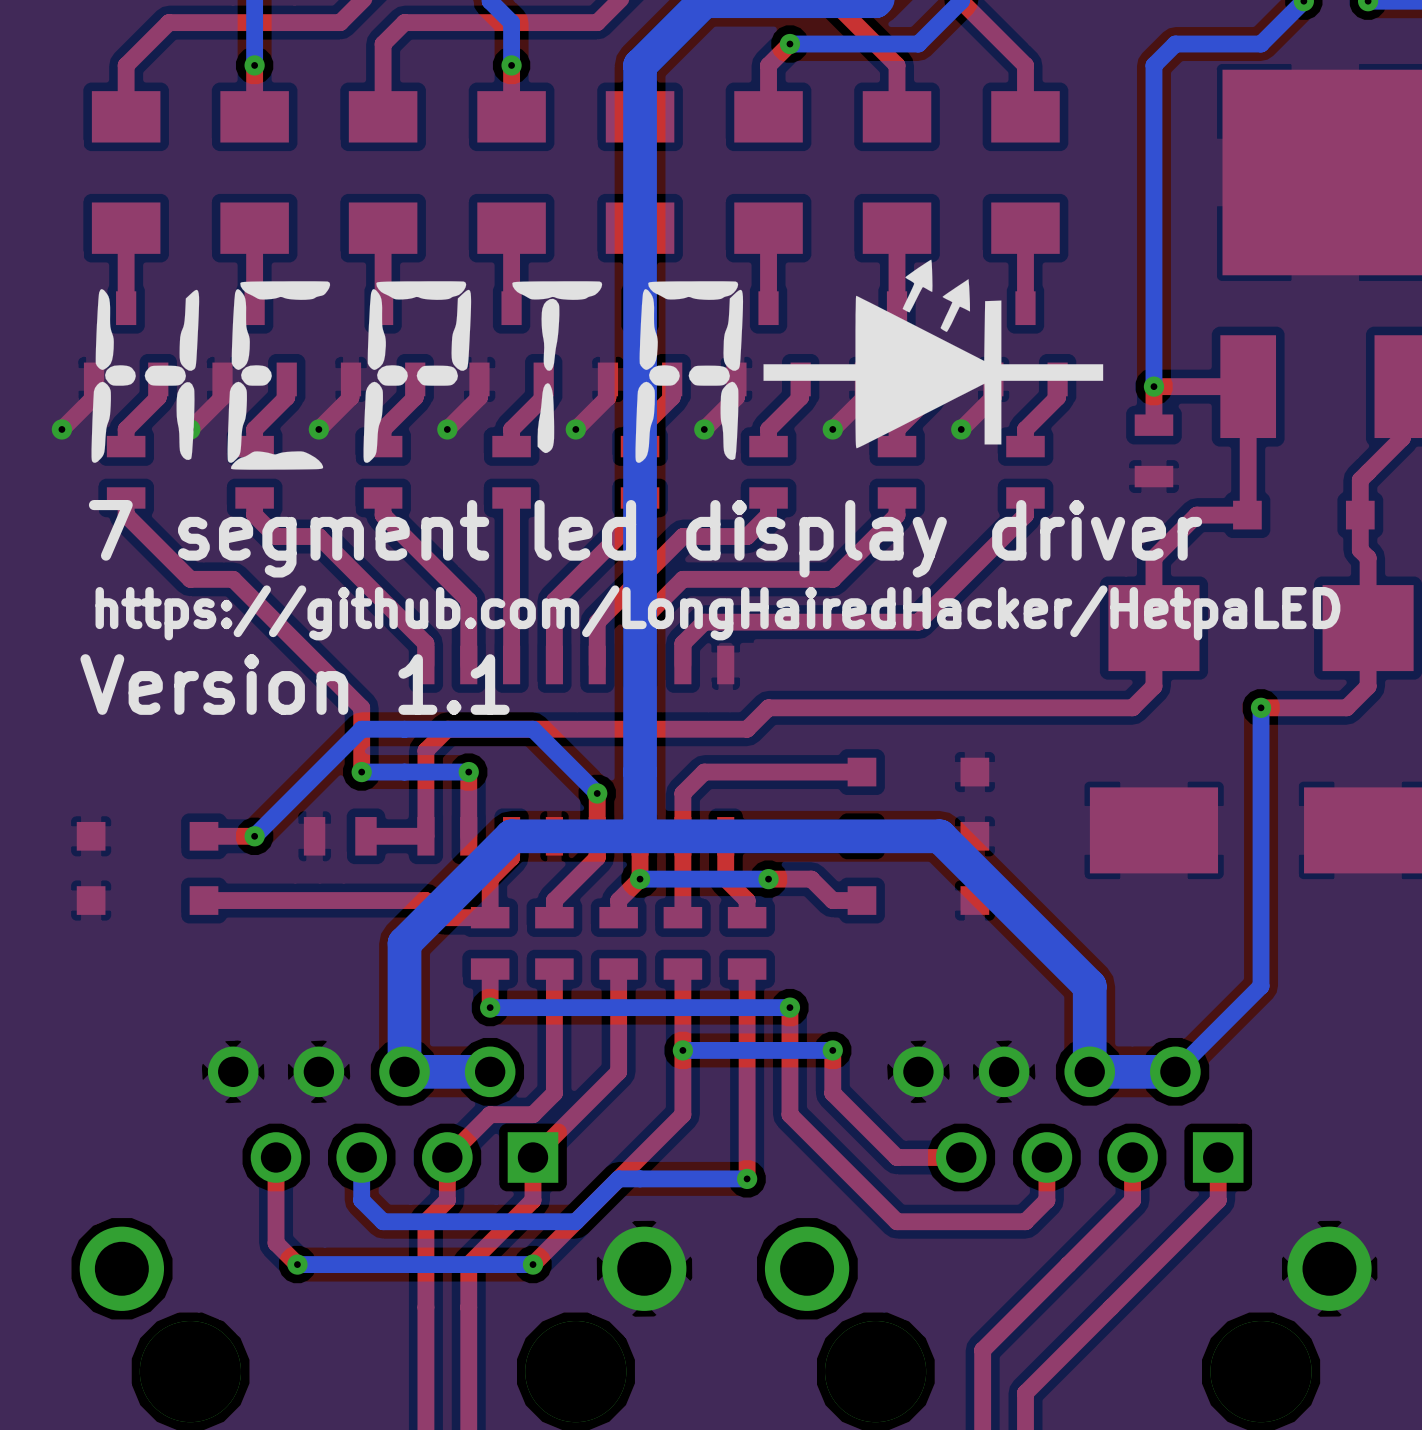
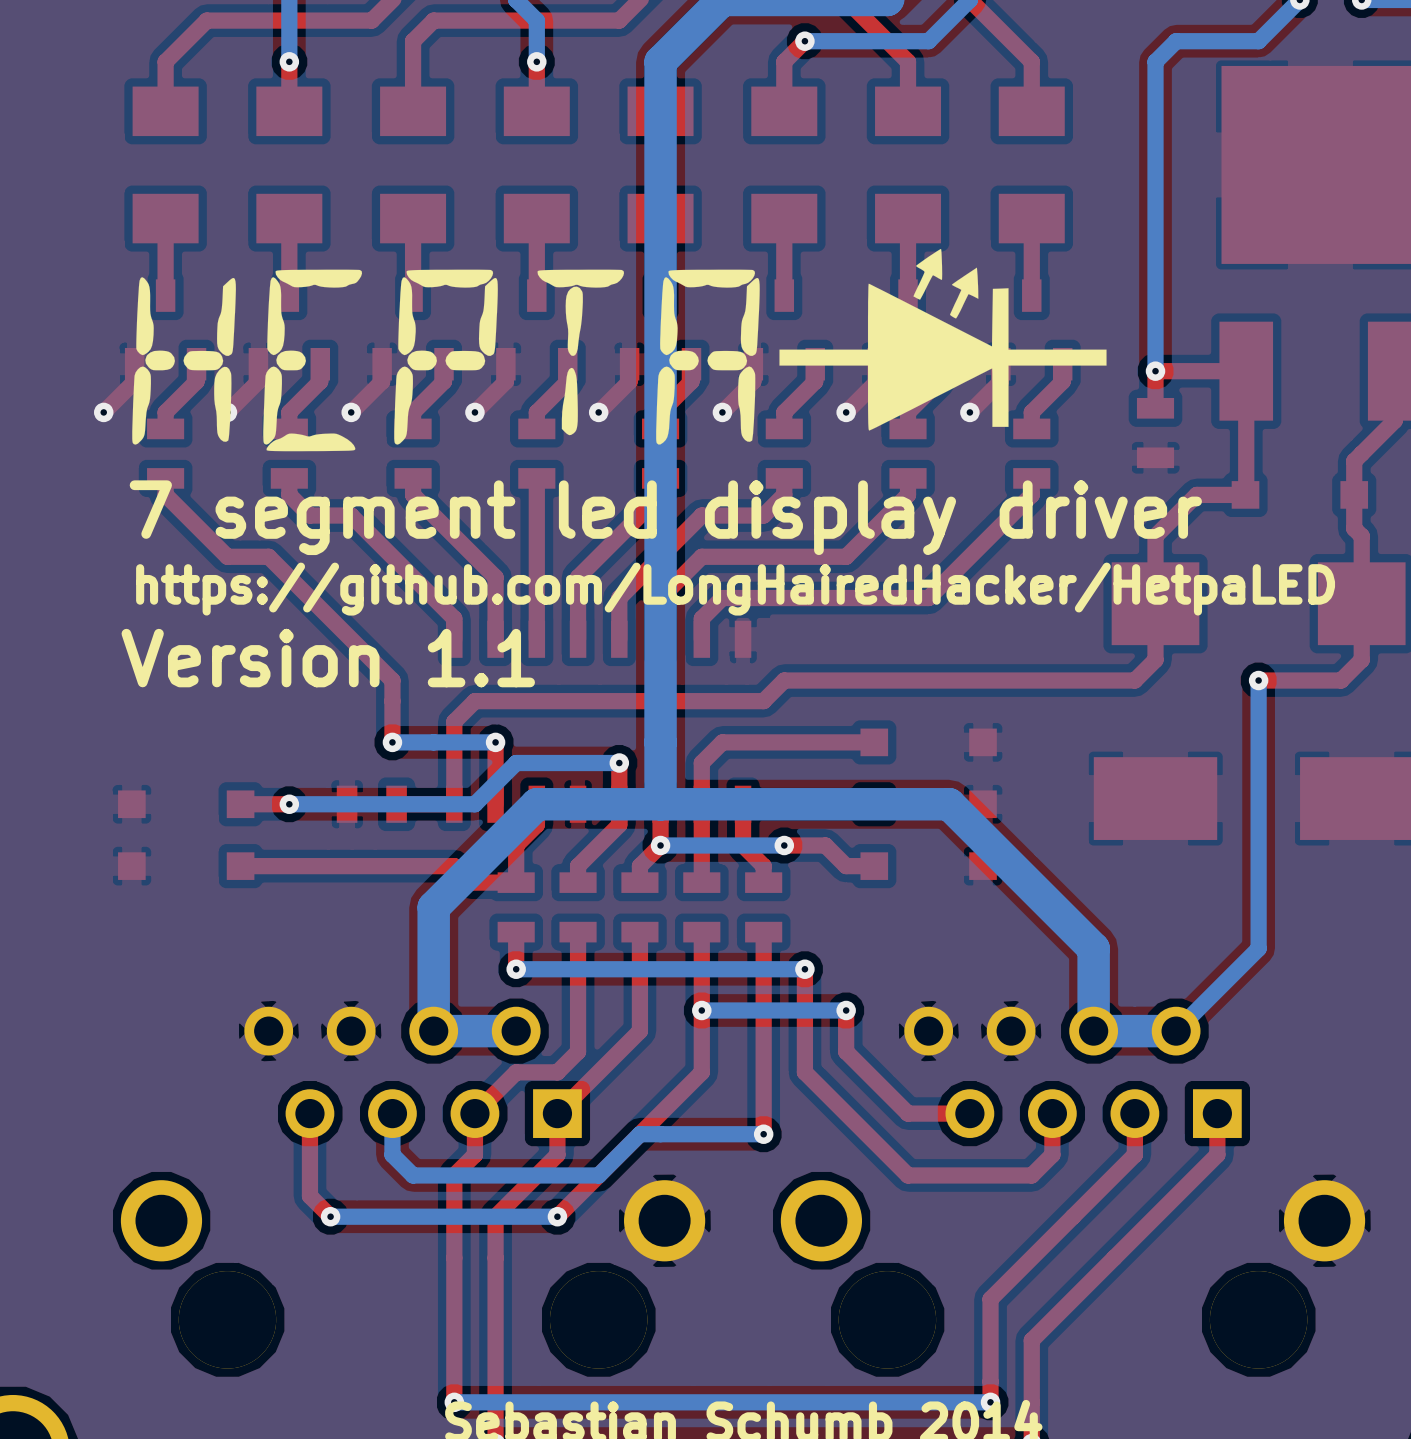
bottom track: (597, 793) (532, 729) (361, 729) (254, 836) -> (619, 763) (516, 763) (474, 804) (289, 804)

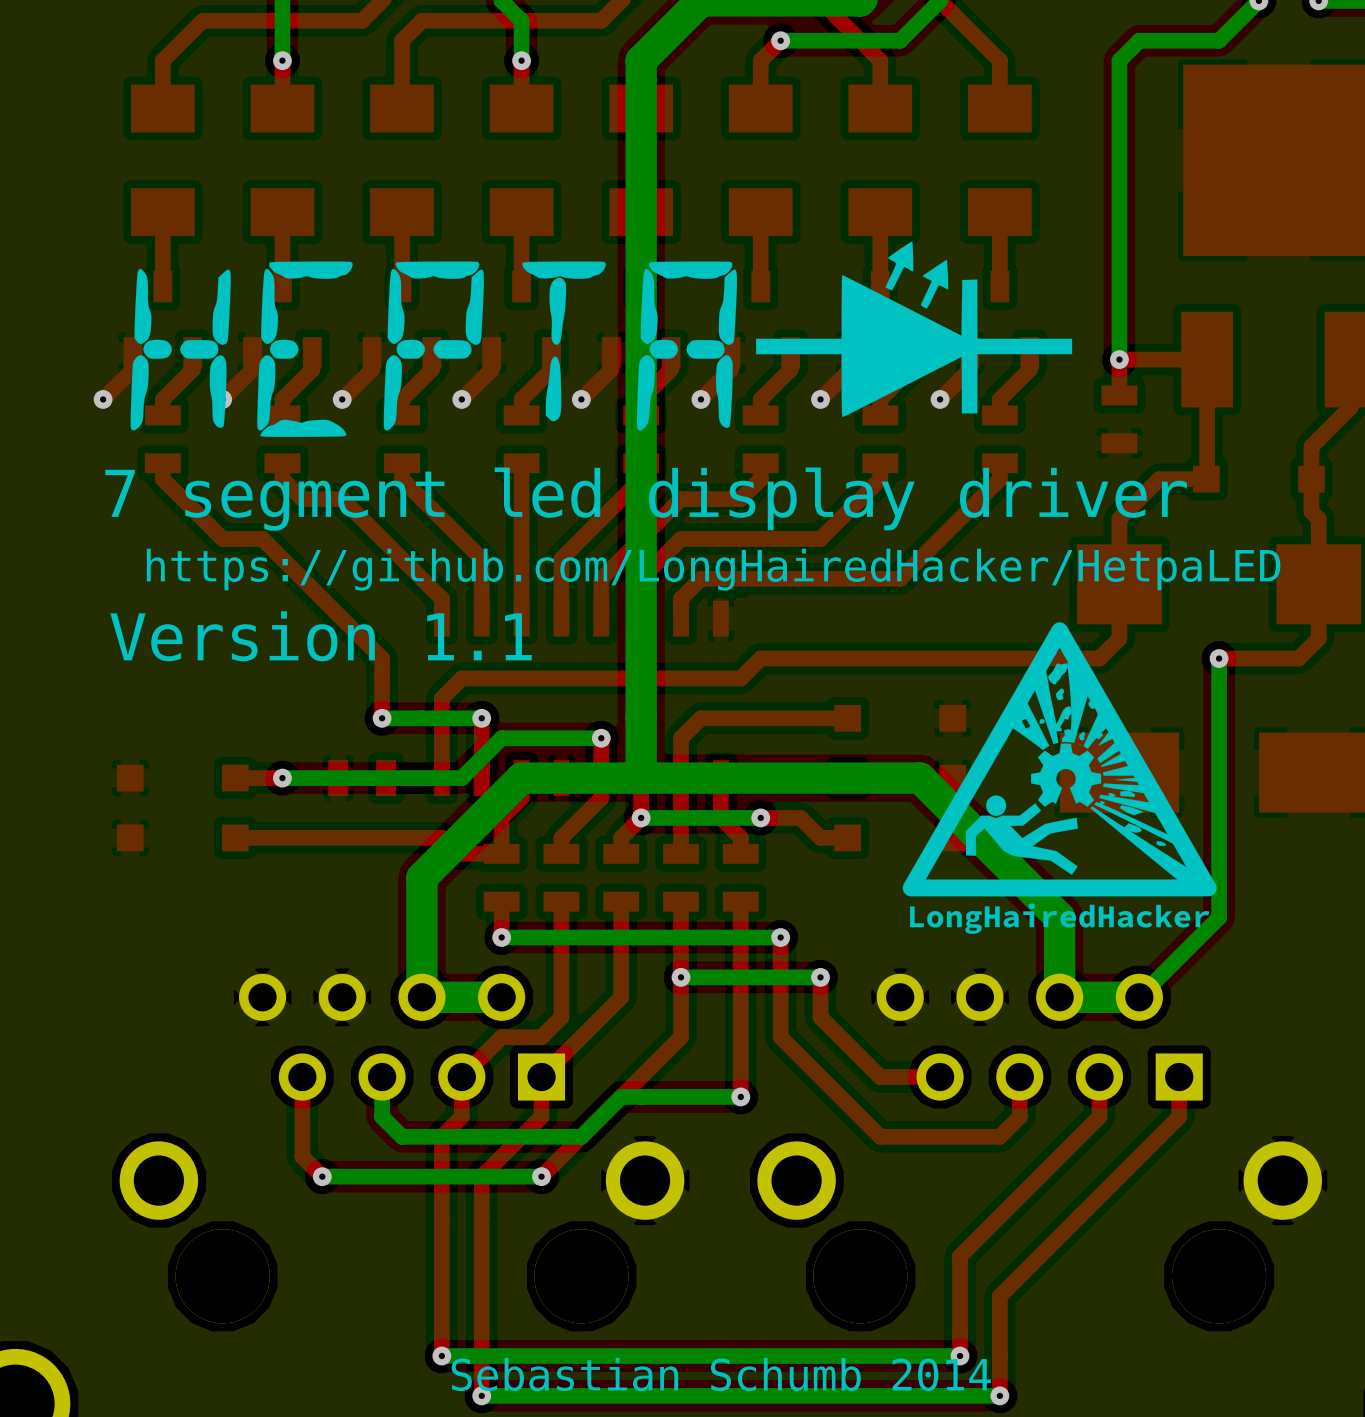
drawing: none -> [902, 622, 1217, 934]

